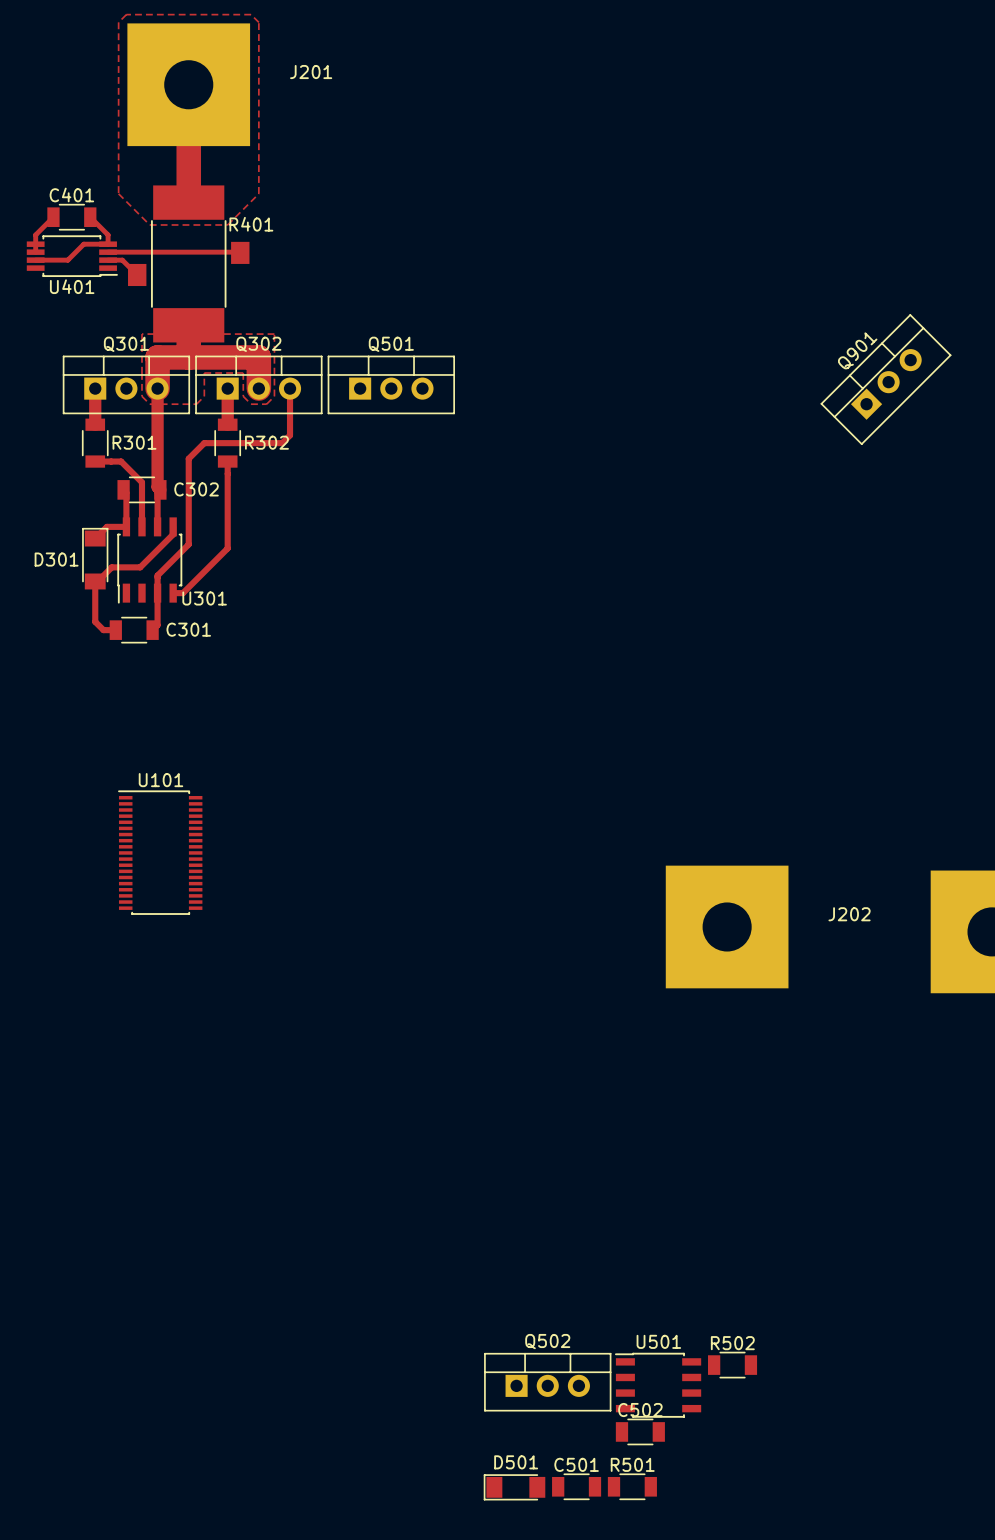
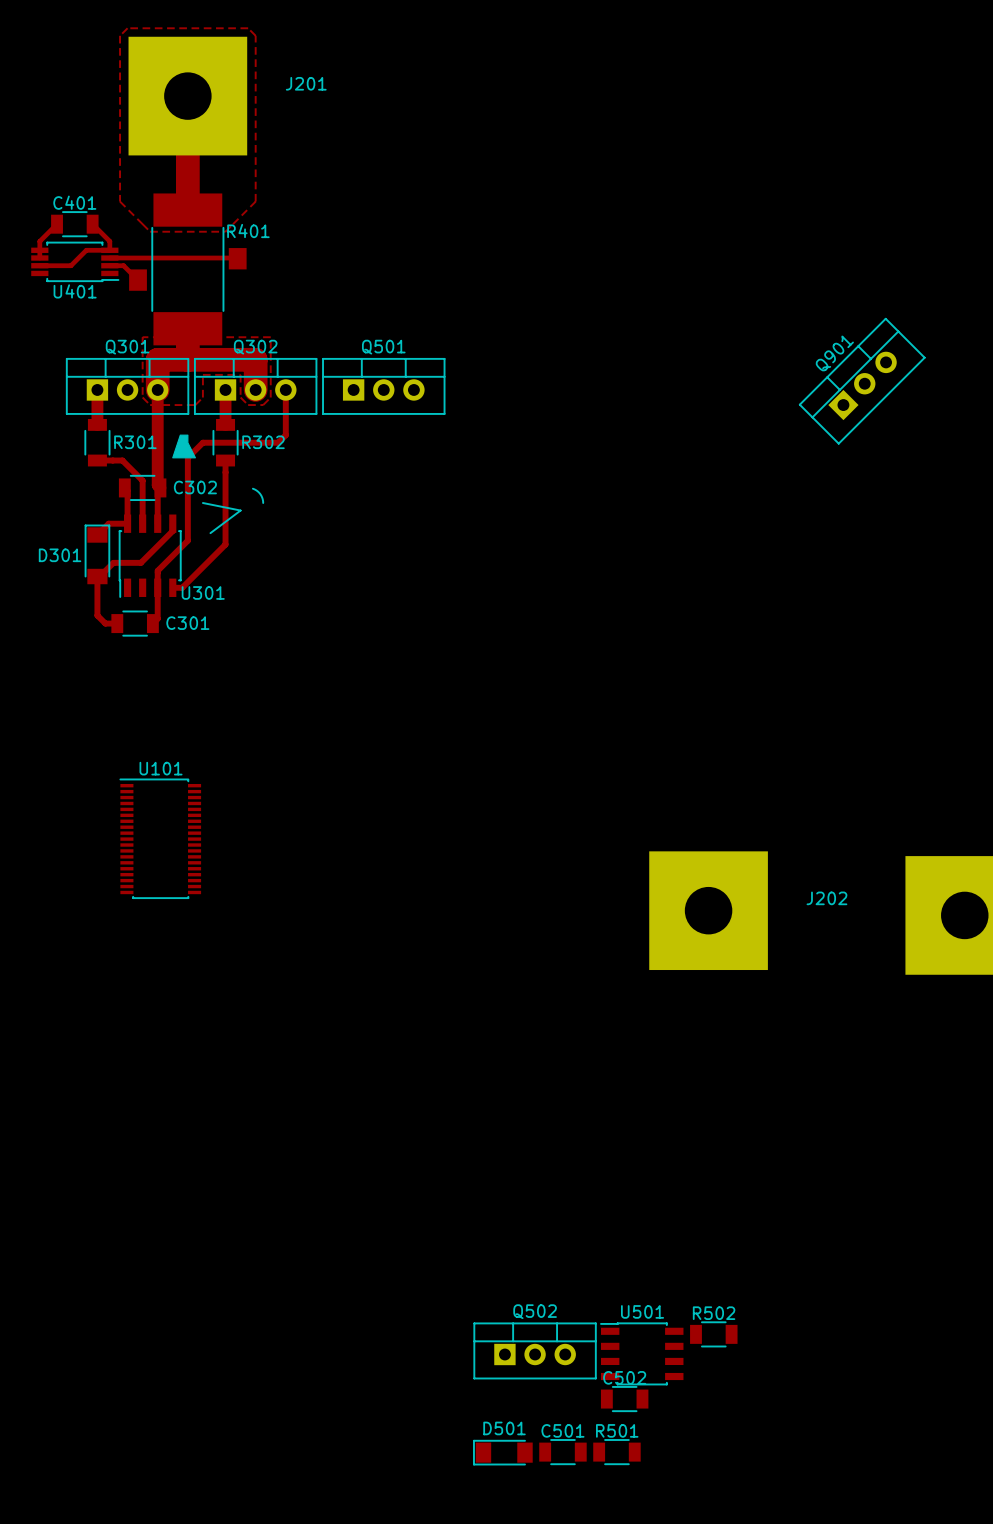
drawing: none -> [172, 434, 196, 459]
line: none -> (252, 488) (260, 494) (263, 503)
line: none -> (202, 503) (240, 510) (210, 533)

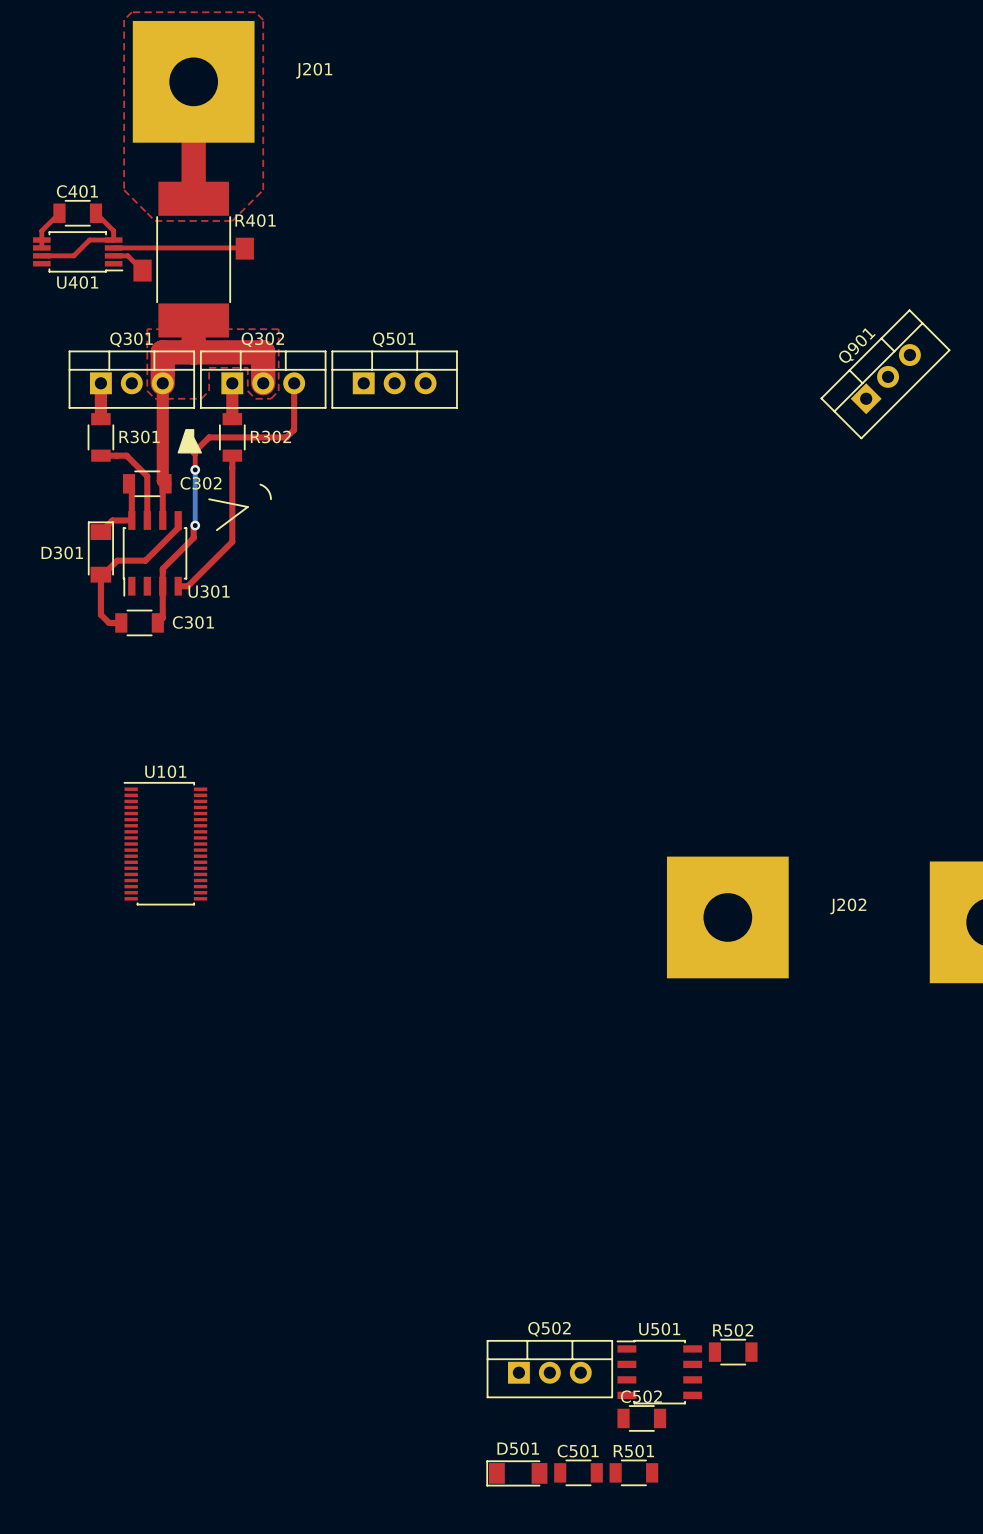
top track: (187, 457) (187, 530) -> (193, 452) (195, 469)
bottom track: none -> (195, 469) (195, 525)
via: none -> (195, 469)
via: none -> (195, 525)

